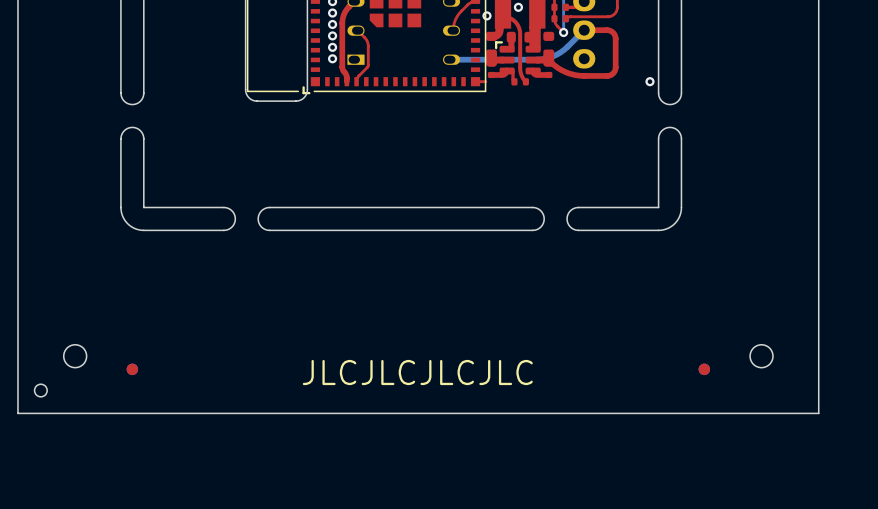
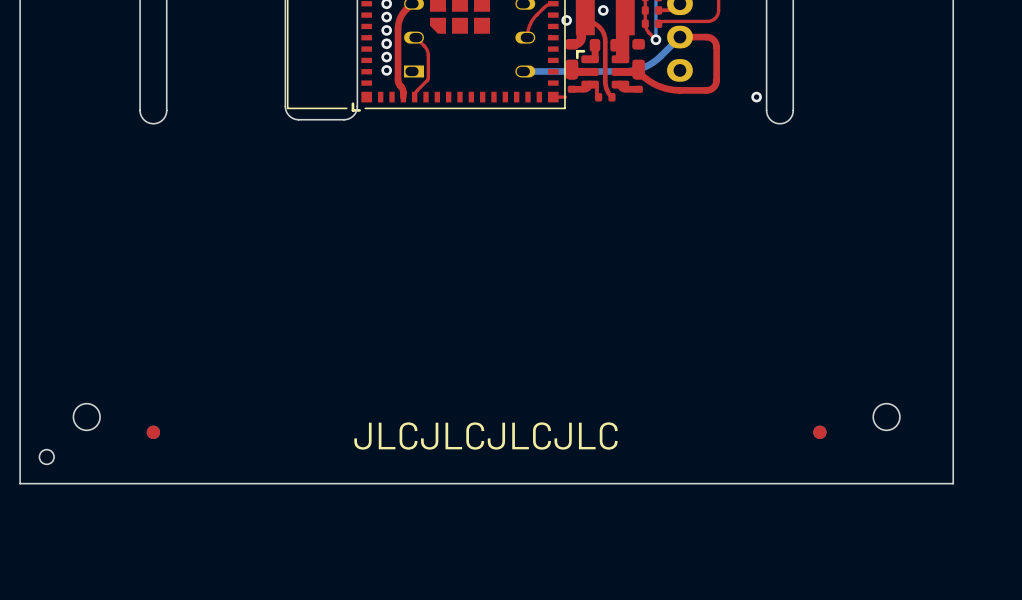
board edge: (120, 138) (121, 210) (123, 217) (129, 225) (143, 230) (223, 230) (232, 225) (235, 220) (234, 214) (226, 207) (143, 207) (143, 135) (139, 129) (130, 127) (123, 131) (120, 138) -> none
board edge: (658, 138) (658, 207) (575, 207) (570, 210) (567, 215) (567, 221) (570, 227) (578, 230) (658, 230) (666, 229) (674, 223) (681, 210) (681, 137) (676, 129) (670, 127) (661, 130) (658, 138) -> none
board edge: (269, 207) (532, 207) (540, 210) (544, 218) (540, 227) (532, 230) (269, 230) (261, 227) (258, 218) (261, 210) (269, 207) -> none

